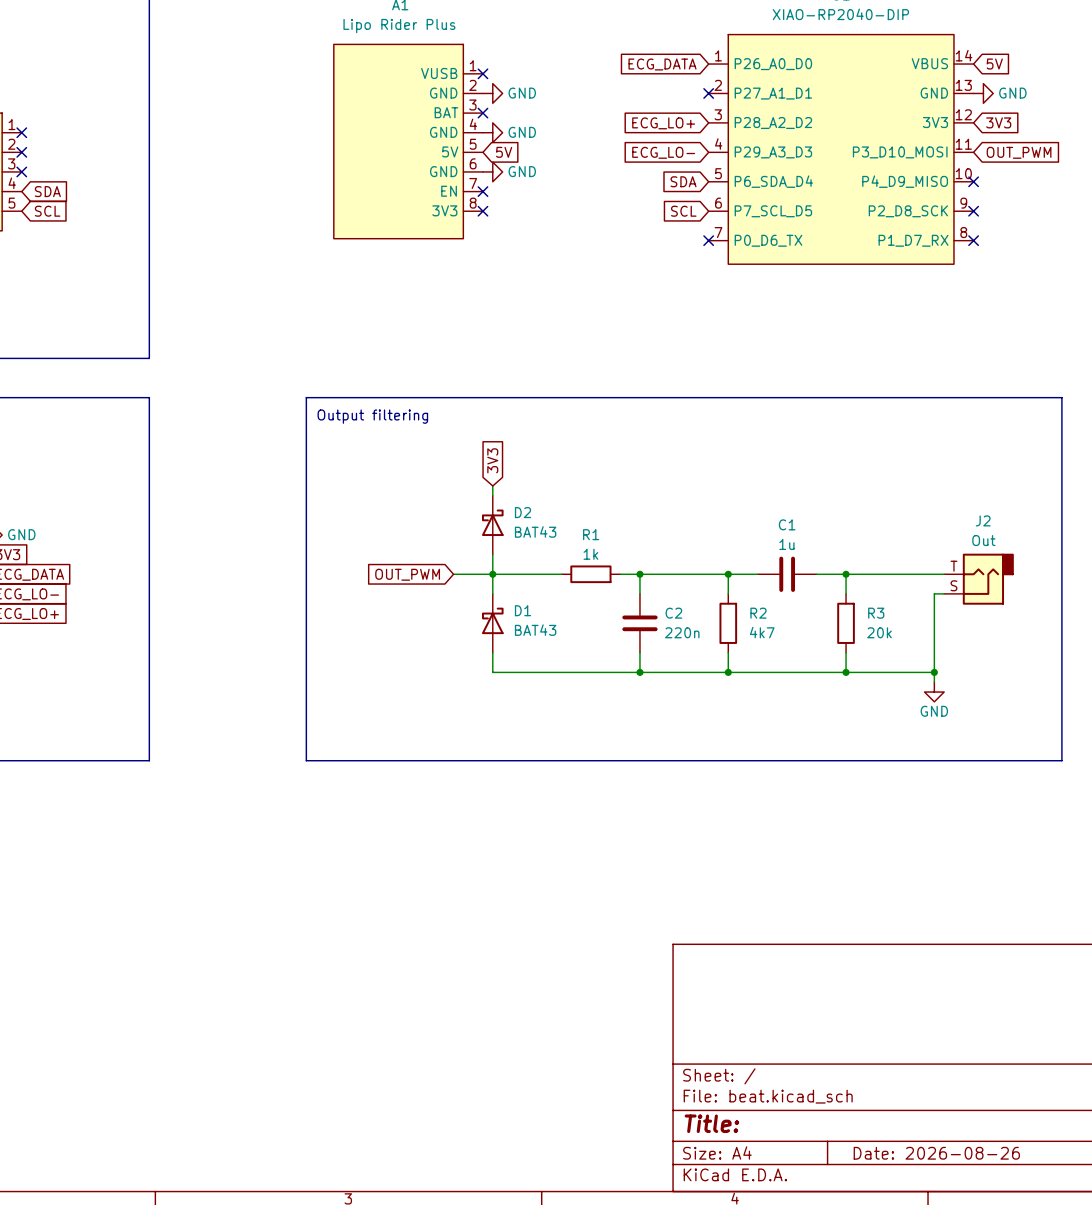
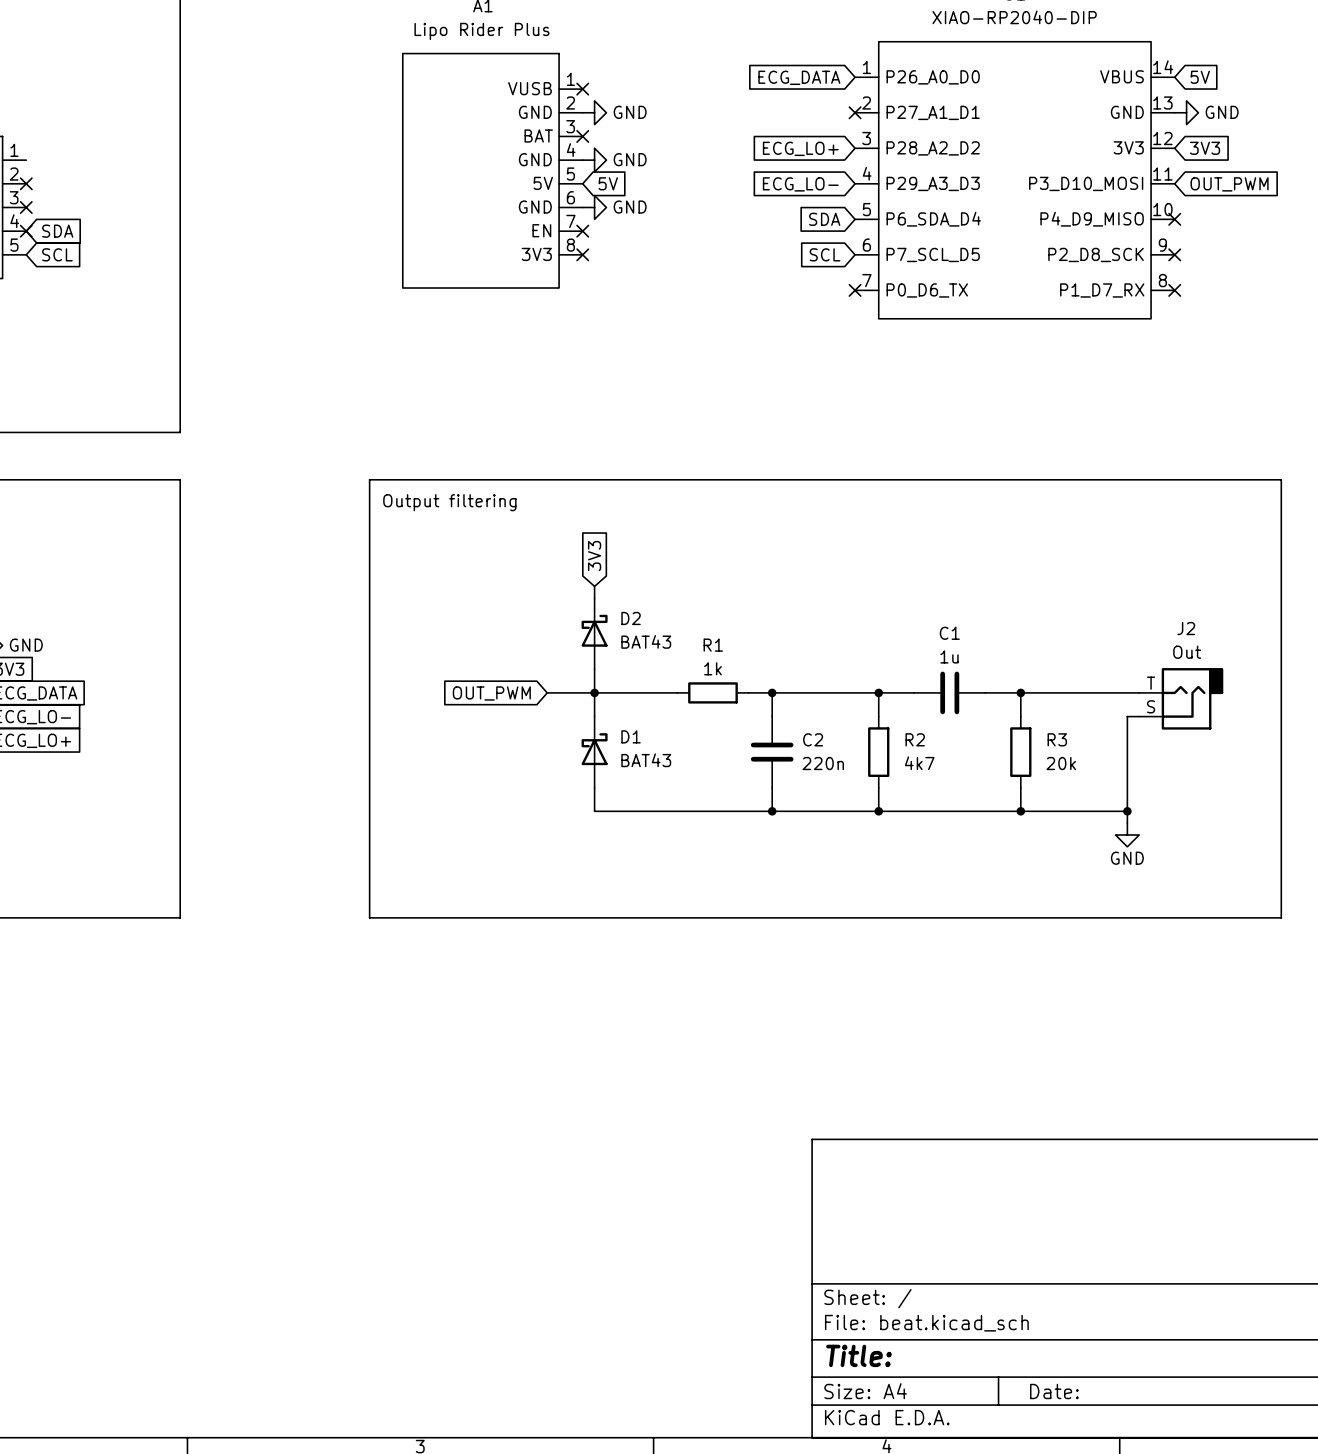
no-connect mark: (21, 132) -> none
no-connect mark: none -> (26, 231)
title block: Date: 2026-08-26 (936, 1153) -> Date: (1054, 1391)

